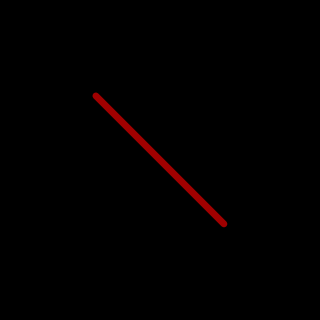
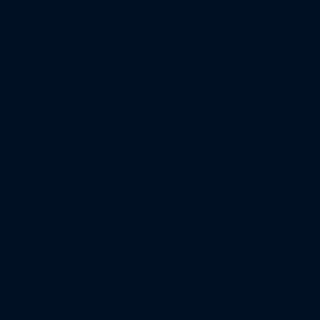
top track: (95, 95) (223, 223) -> none

